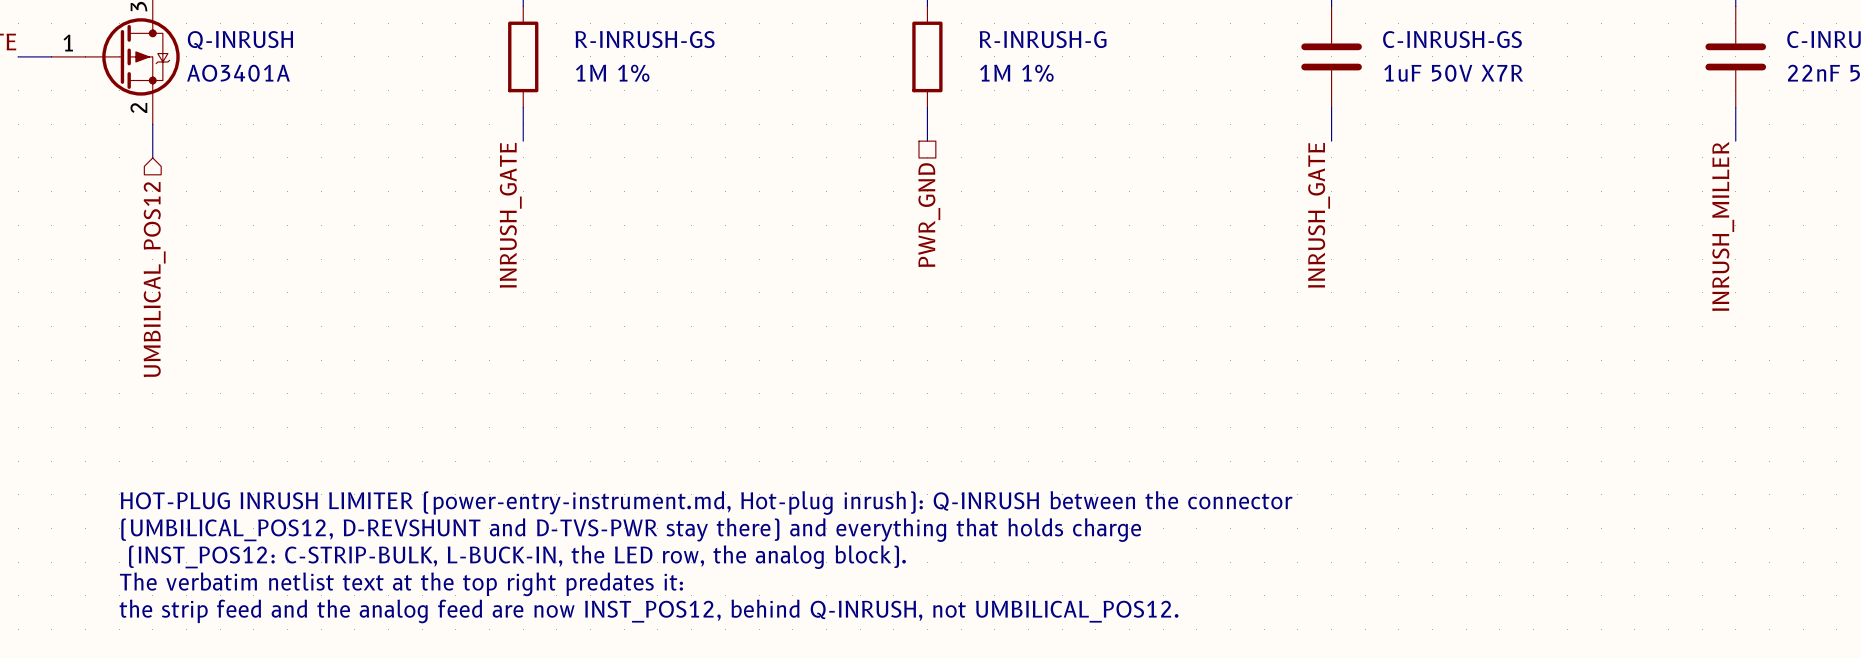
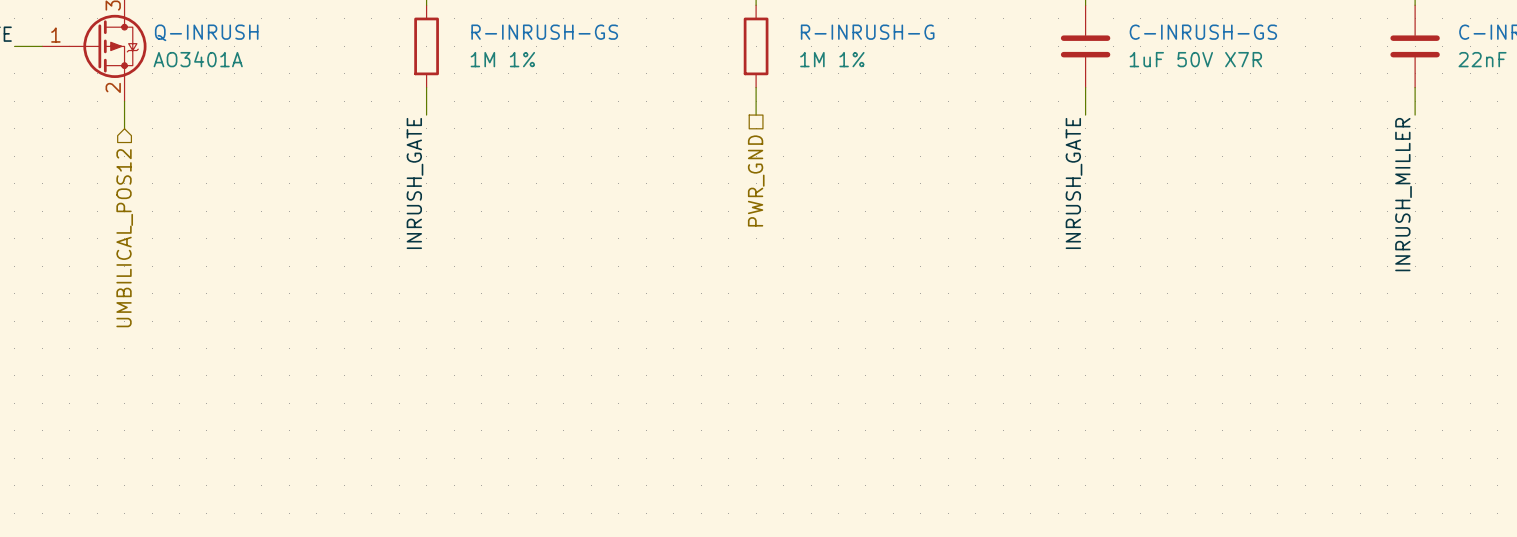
text: HOT-PLUG INRUSH LIMITER (power-entry-instrument.md, Hot-plug inrush): Q-INRUSH between the connector (706, 503) -> none
text: (UMBILICAL_POS12, D-REVSHUNT and D-TVS-PWR stay there) and everything that holds charge (631, 530) -> none
text: (INST_POS12: C-STRIP-BULK, L-BUCK-IN, the LED row, the analog block). (517, 557) -> none
text: The verbatim netlist text at the top right predates it: (401, 584) -> none
text: the strip feed and the analog feed are now INST_POS12, behind Q-INRUSH, not UMBILICAL_POS12. (649, 611) -> none

